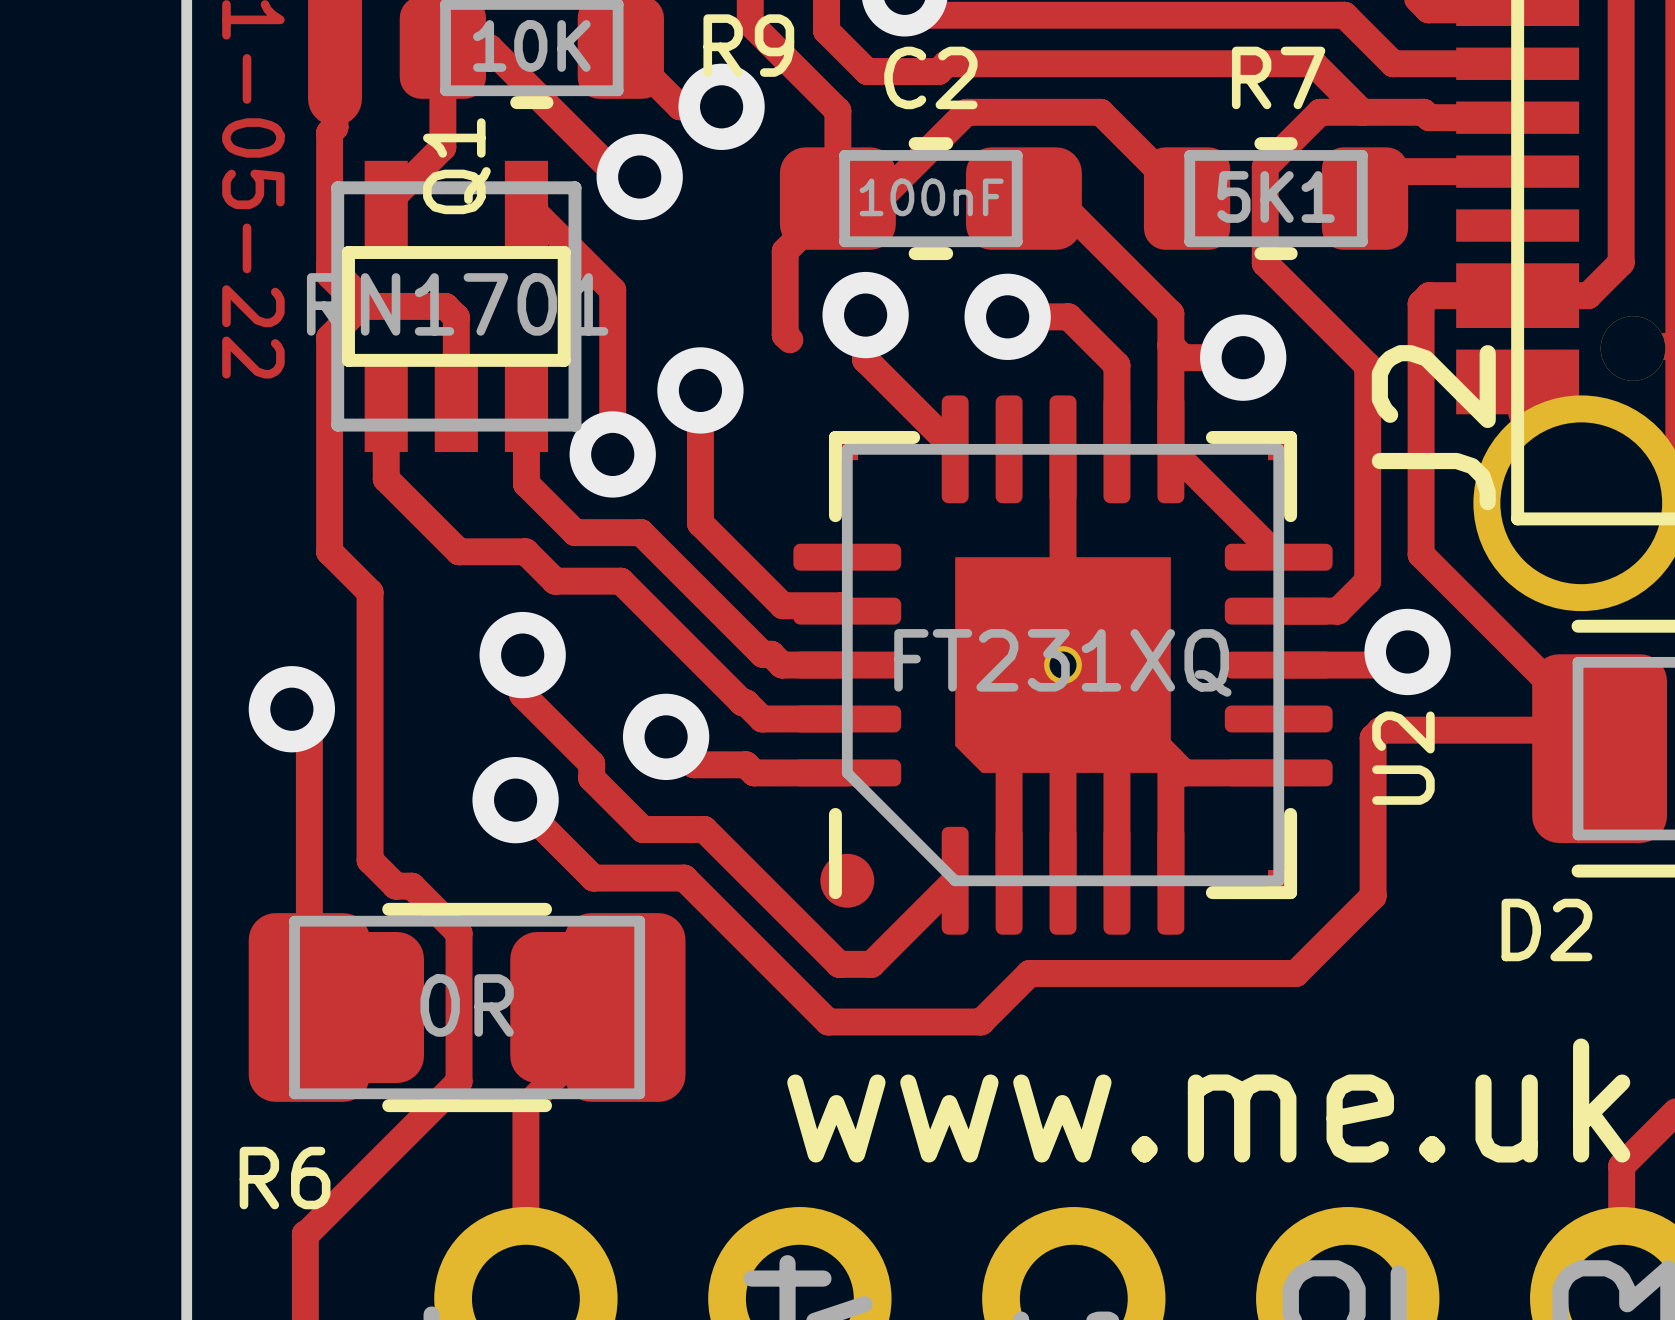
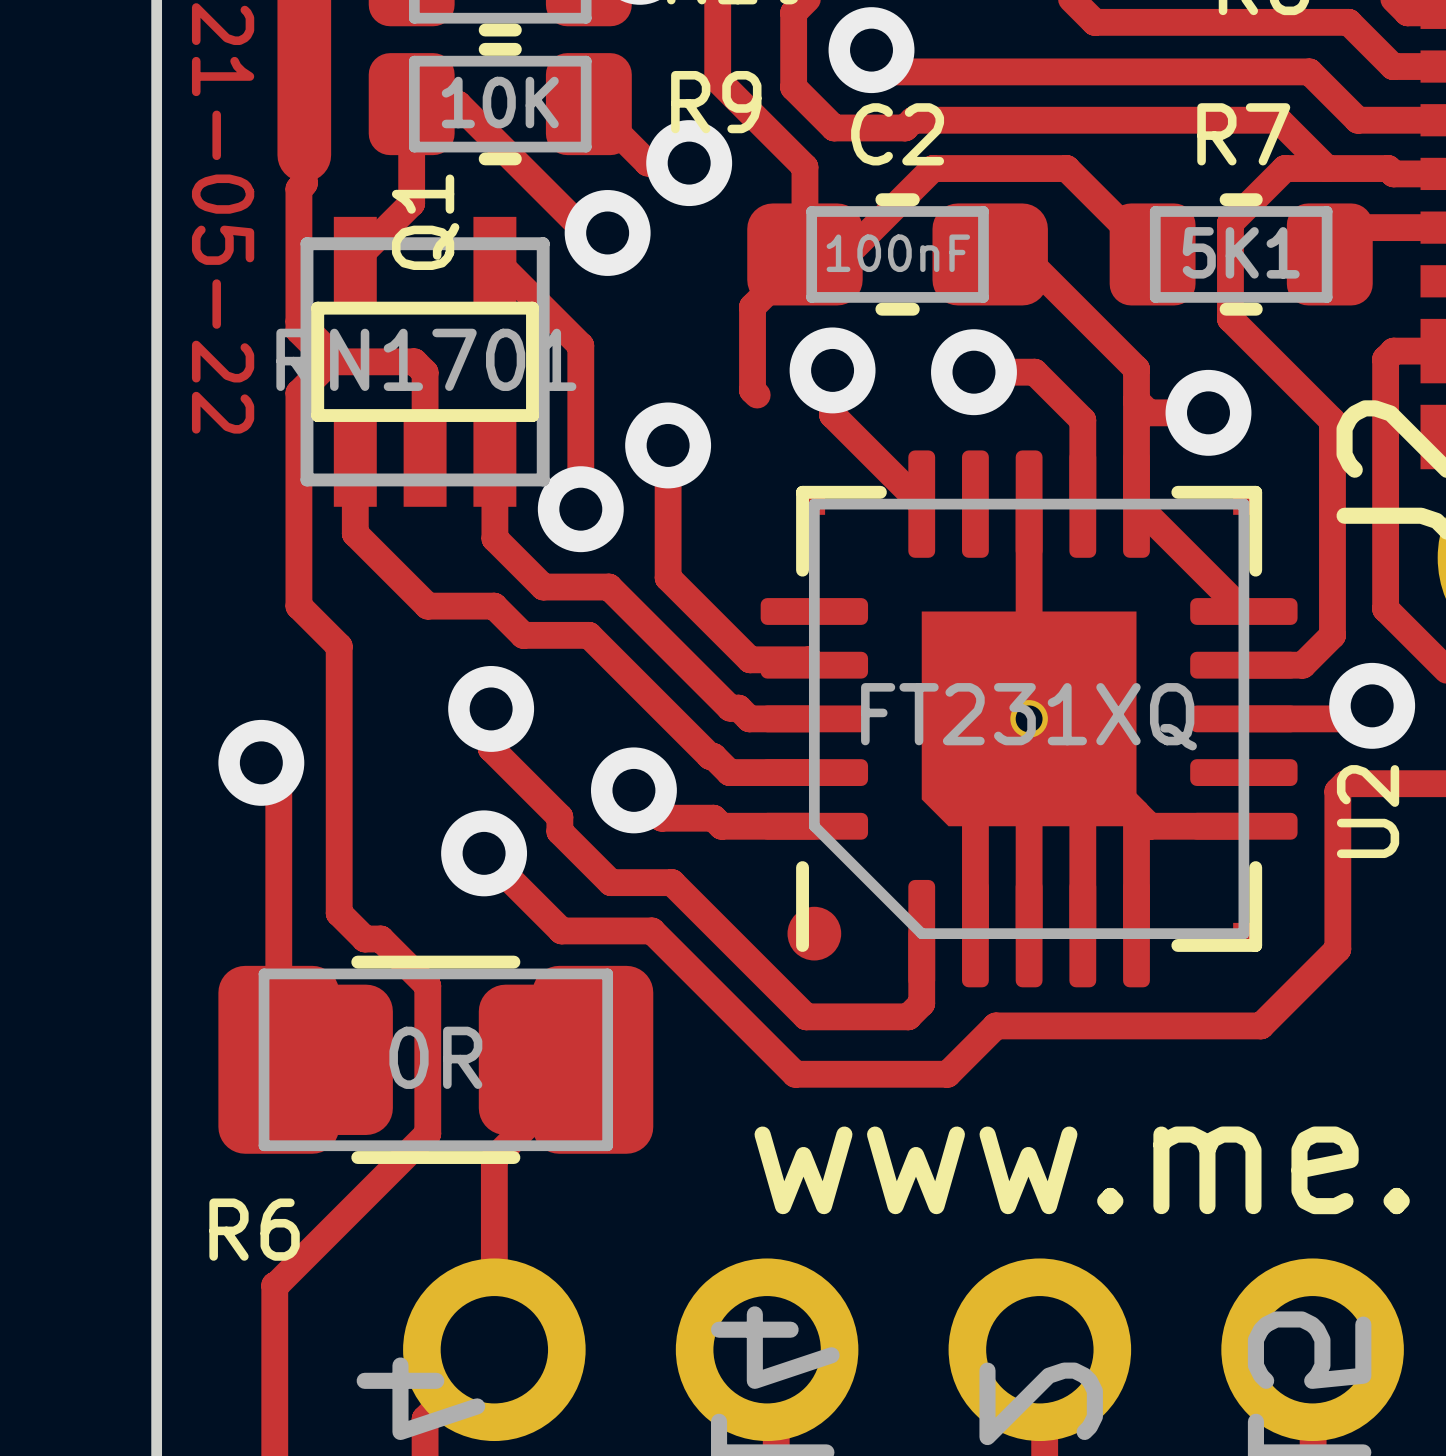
track: (955, 880) (871, 964) -> (921, 933) (921, 1003) (908, 1016) (838, 1016)

